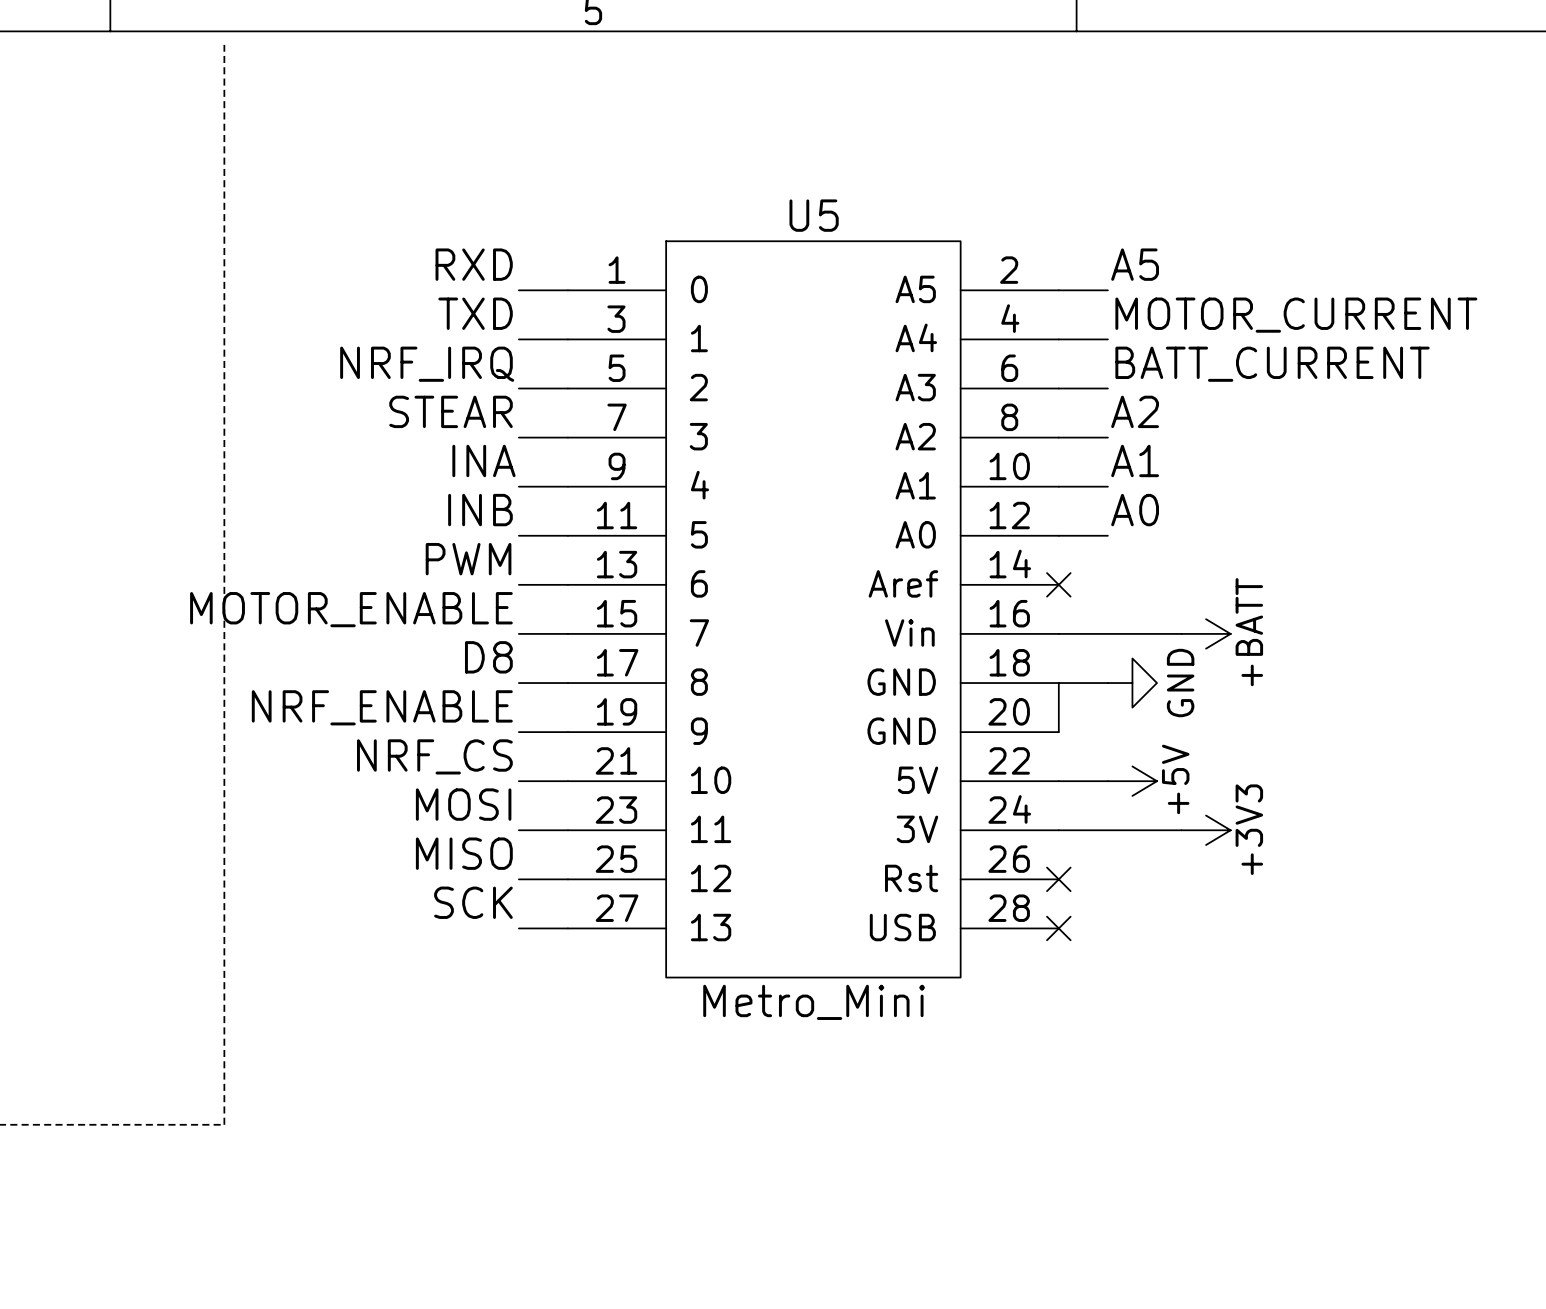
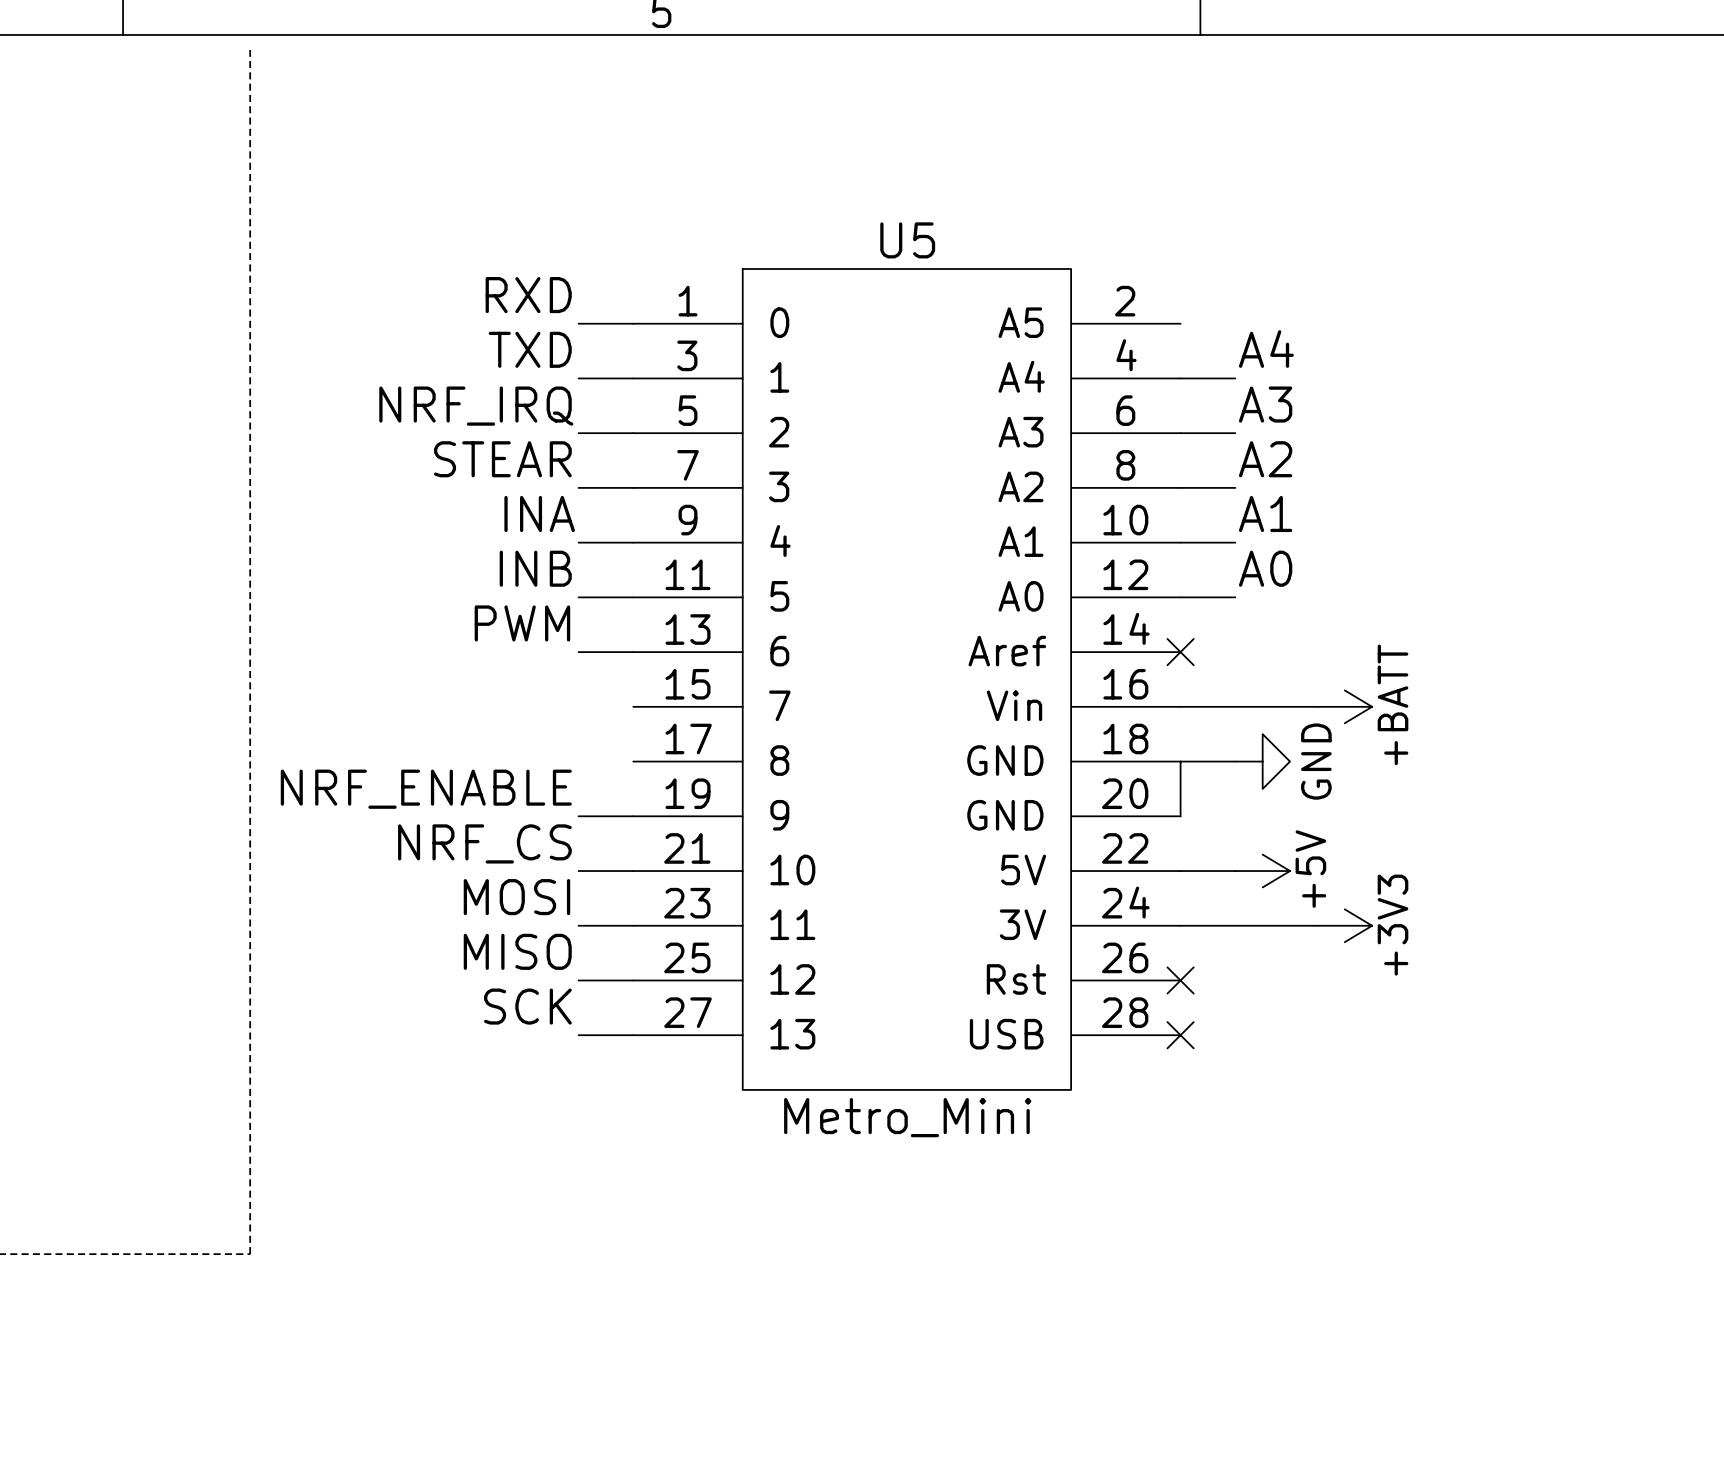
label: A5 (1135, 264) -> none
wire: (1058, 290) (1107, 290) -> none
label: MOTOR_CURRENT (1296, 315) -> A4 (1266, 349)
label: BATT_CURRENT (1272, 364) -> A3 (1265, 404)
label: MOTOR_ENABLE (351, 609) -> none
wire: (518, 633) (567, 633) -> none
label: D8 (488, 657) -> none
wire: (518, 683) (567, 683) -> none

